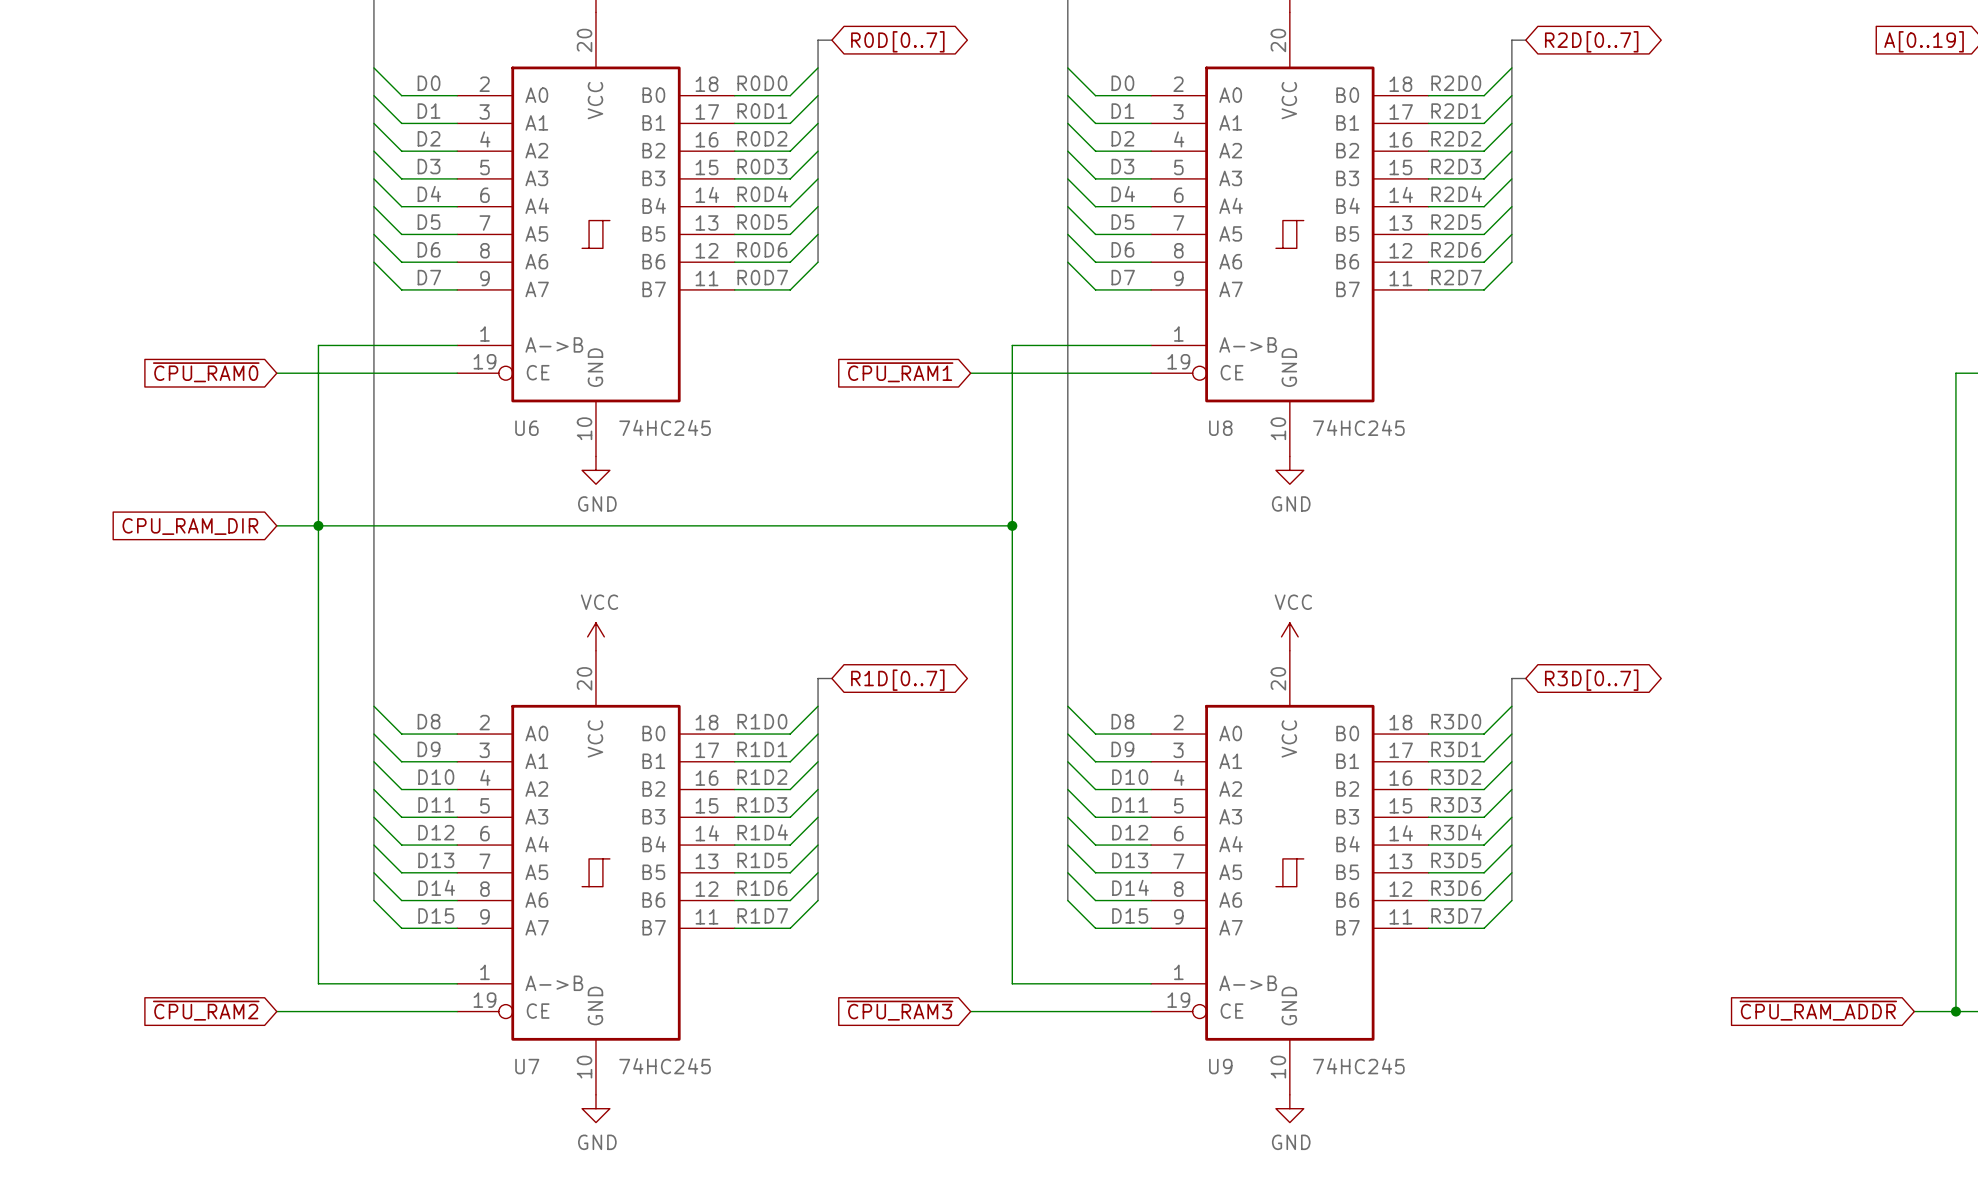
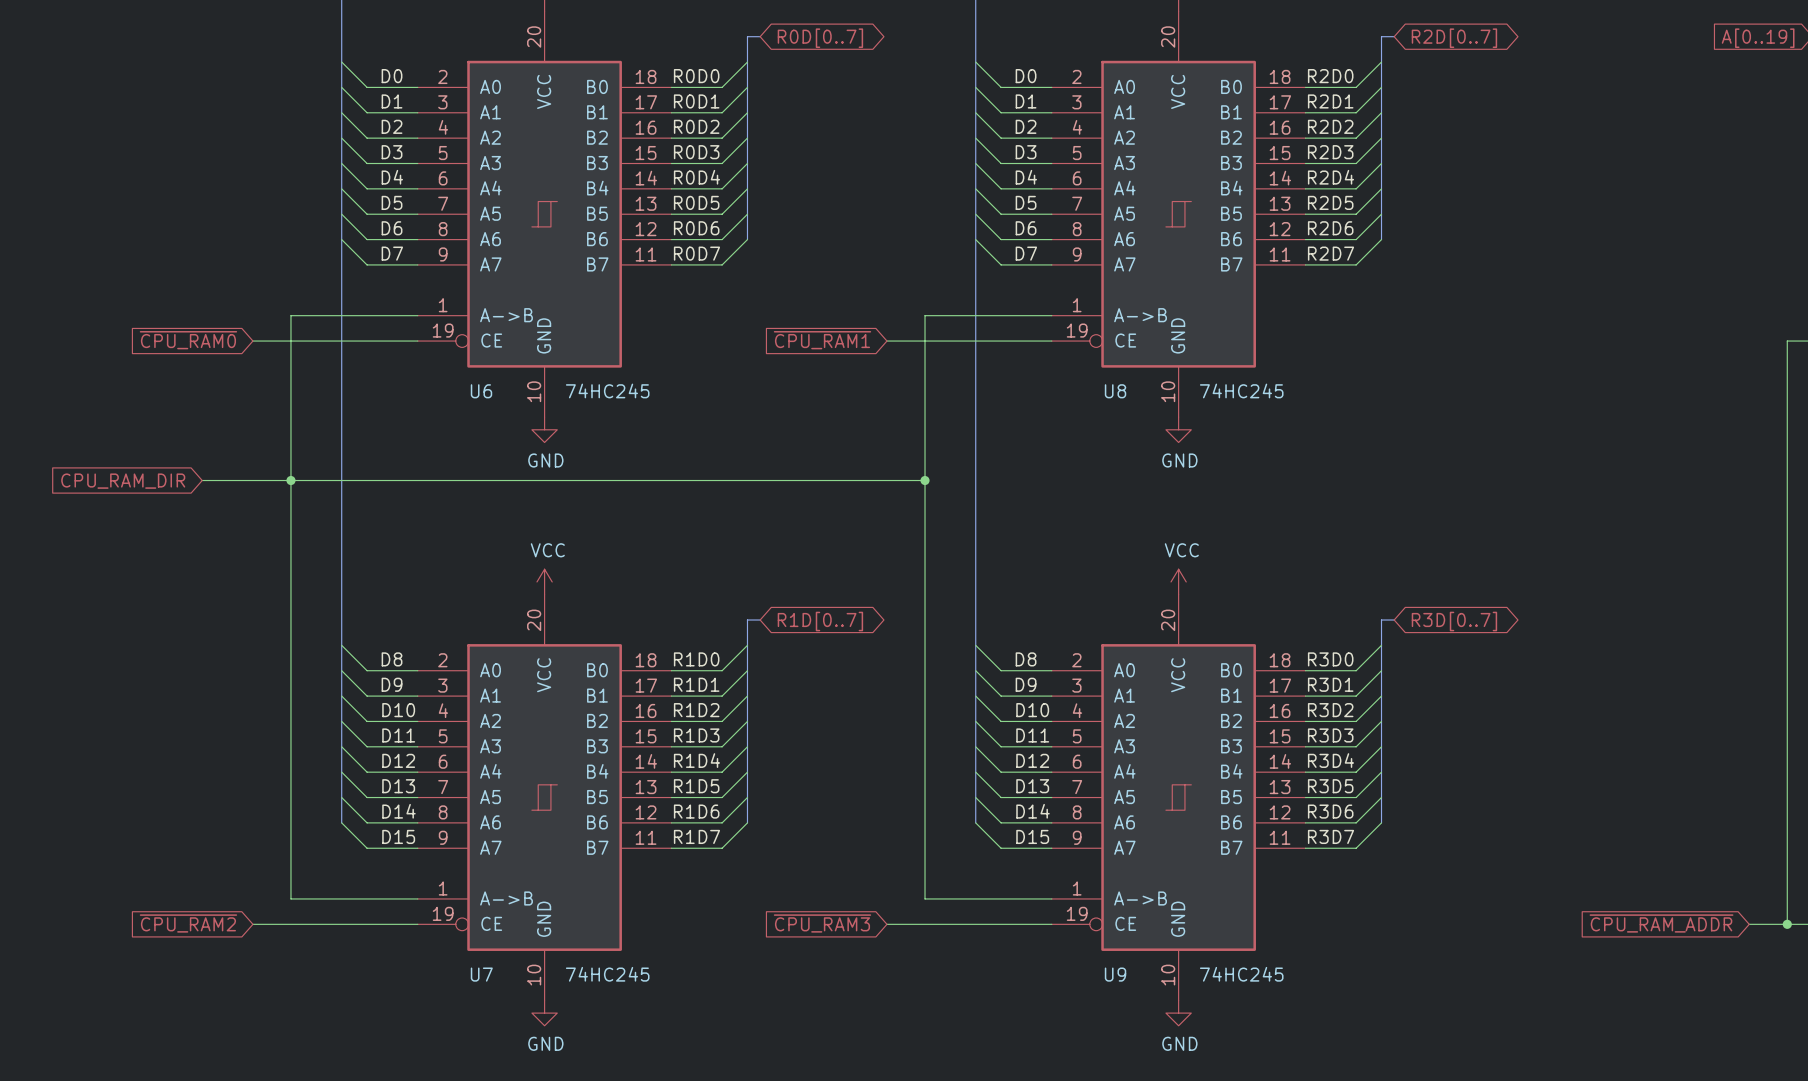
wire: none -> (202, 480) (252, 480)
global label position: CPU_RAM_DIR (190, 526) -> CPU_RAM_DIR (123, 481)

